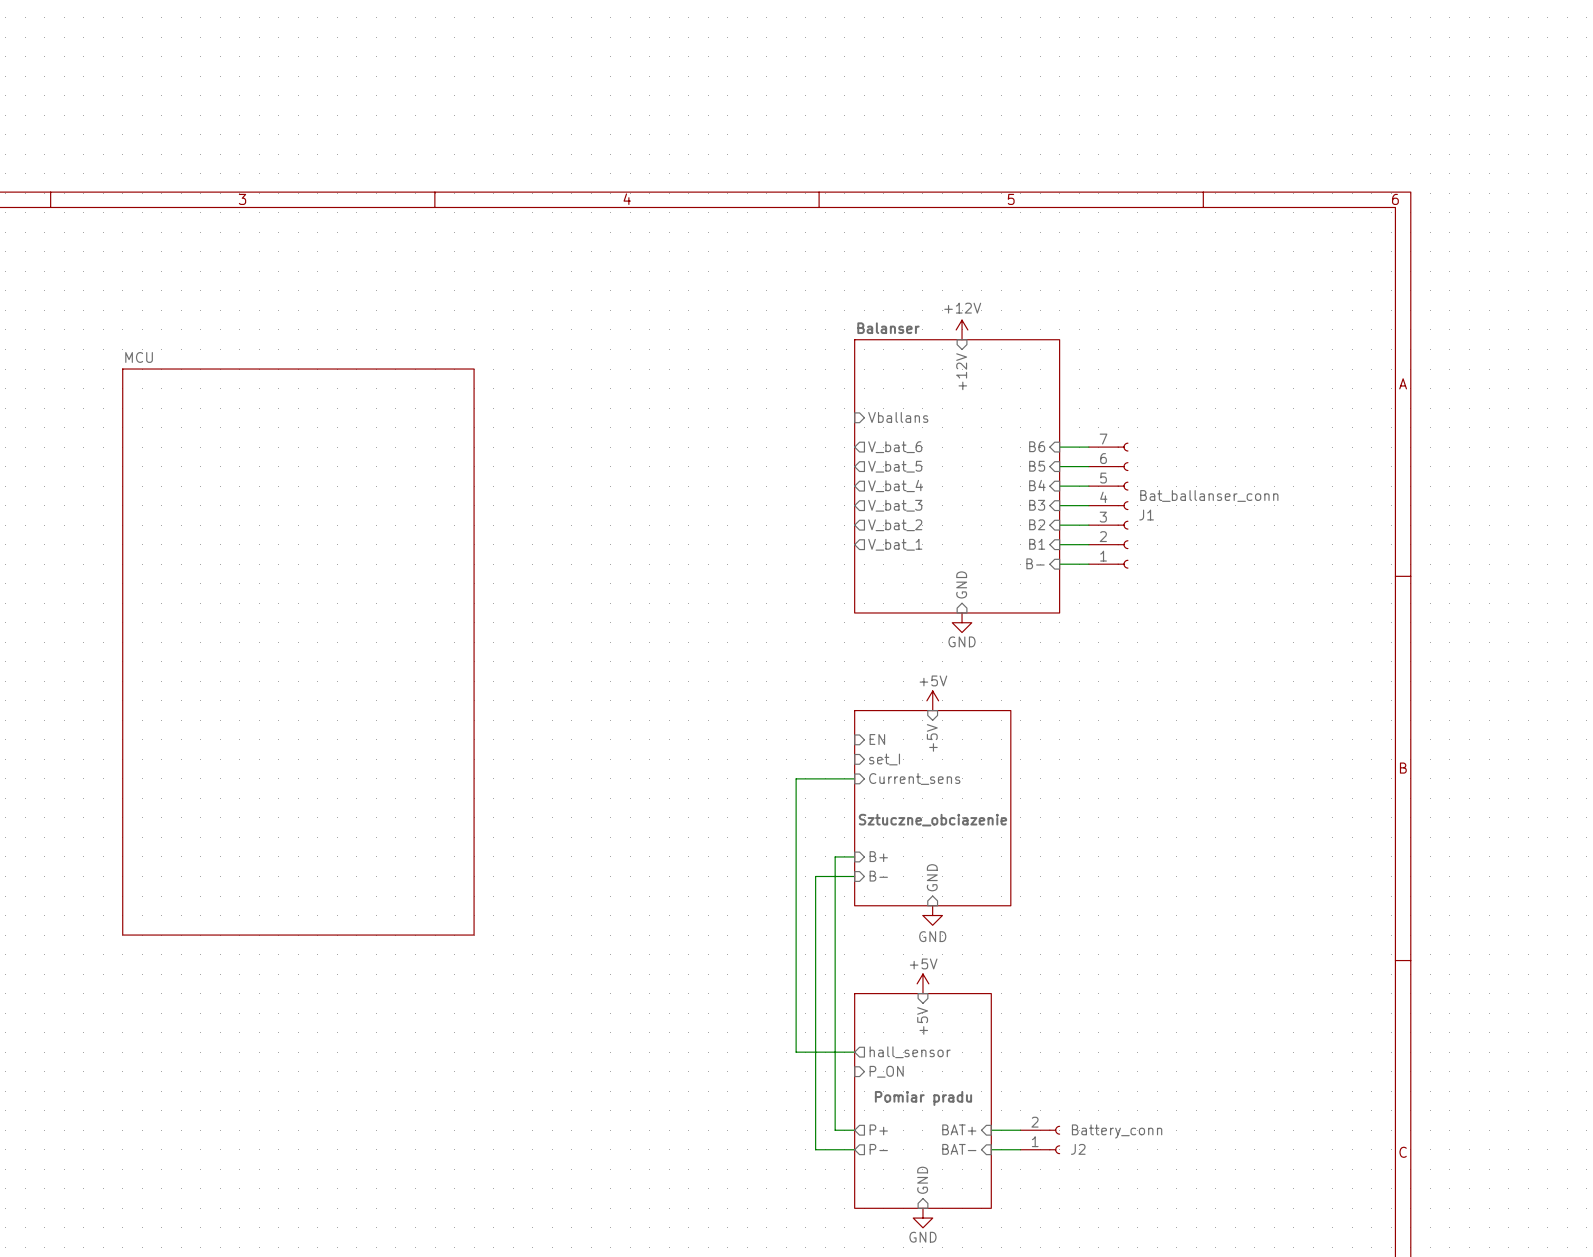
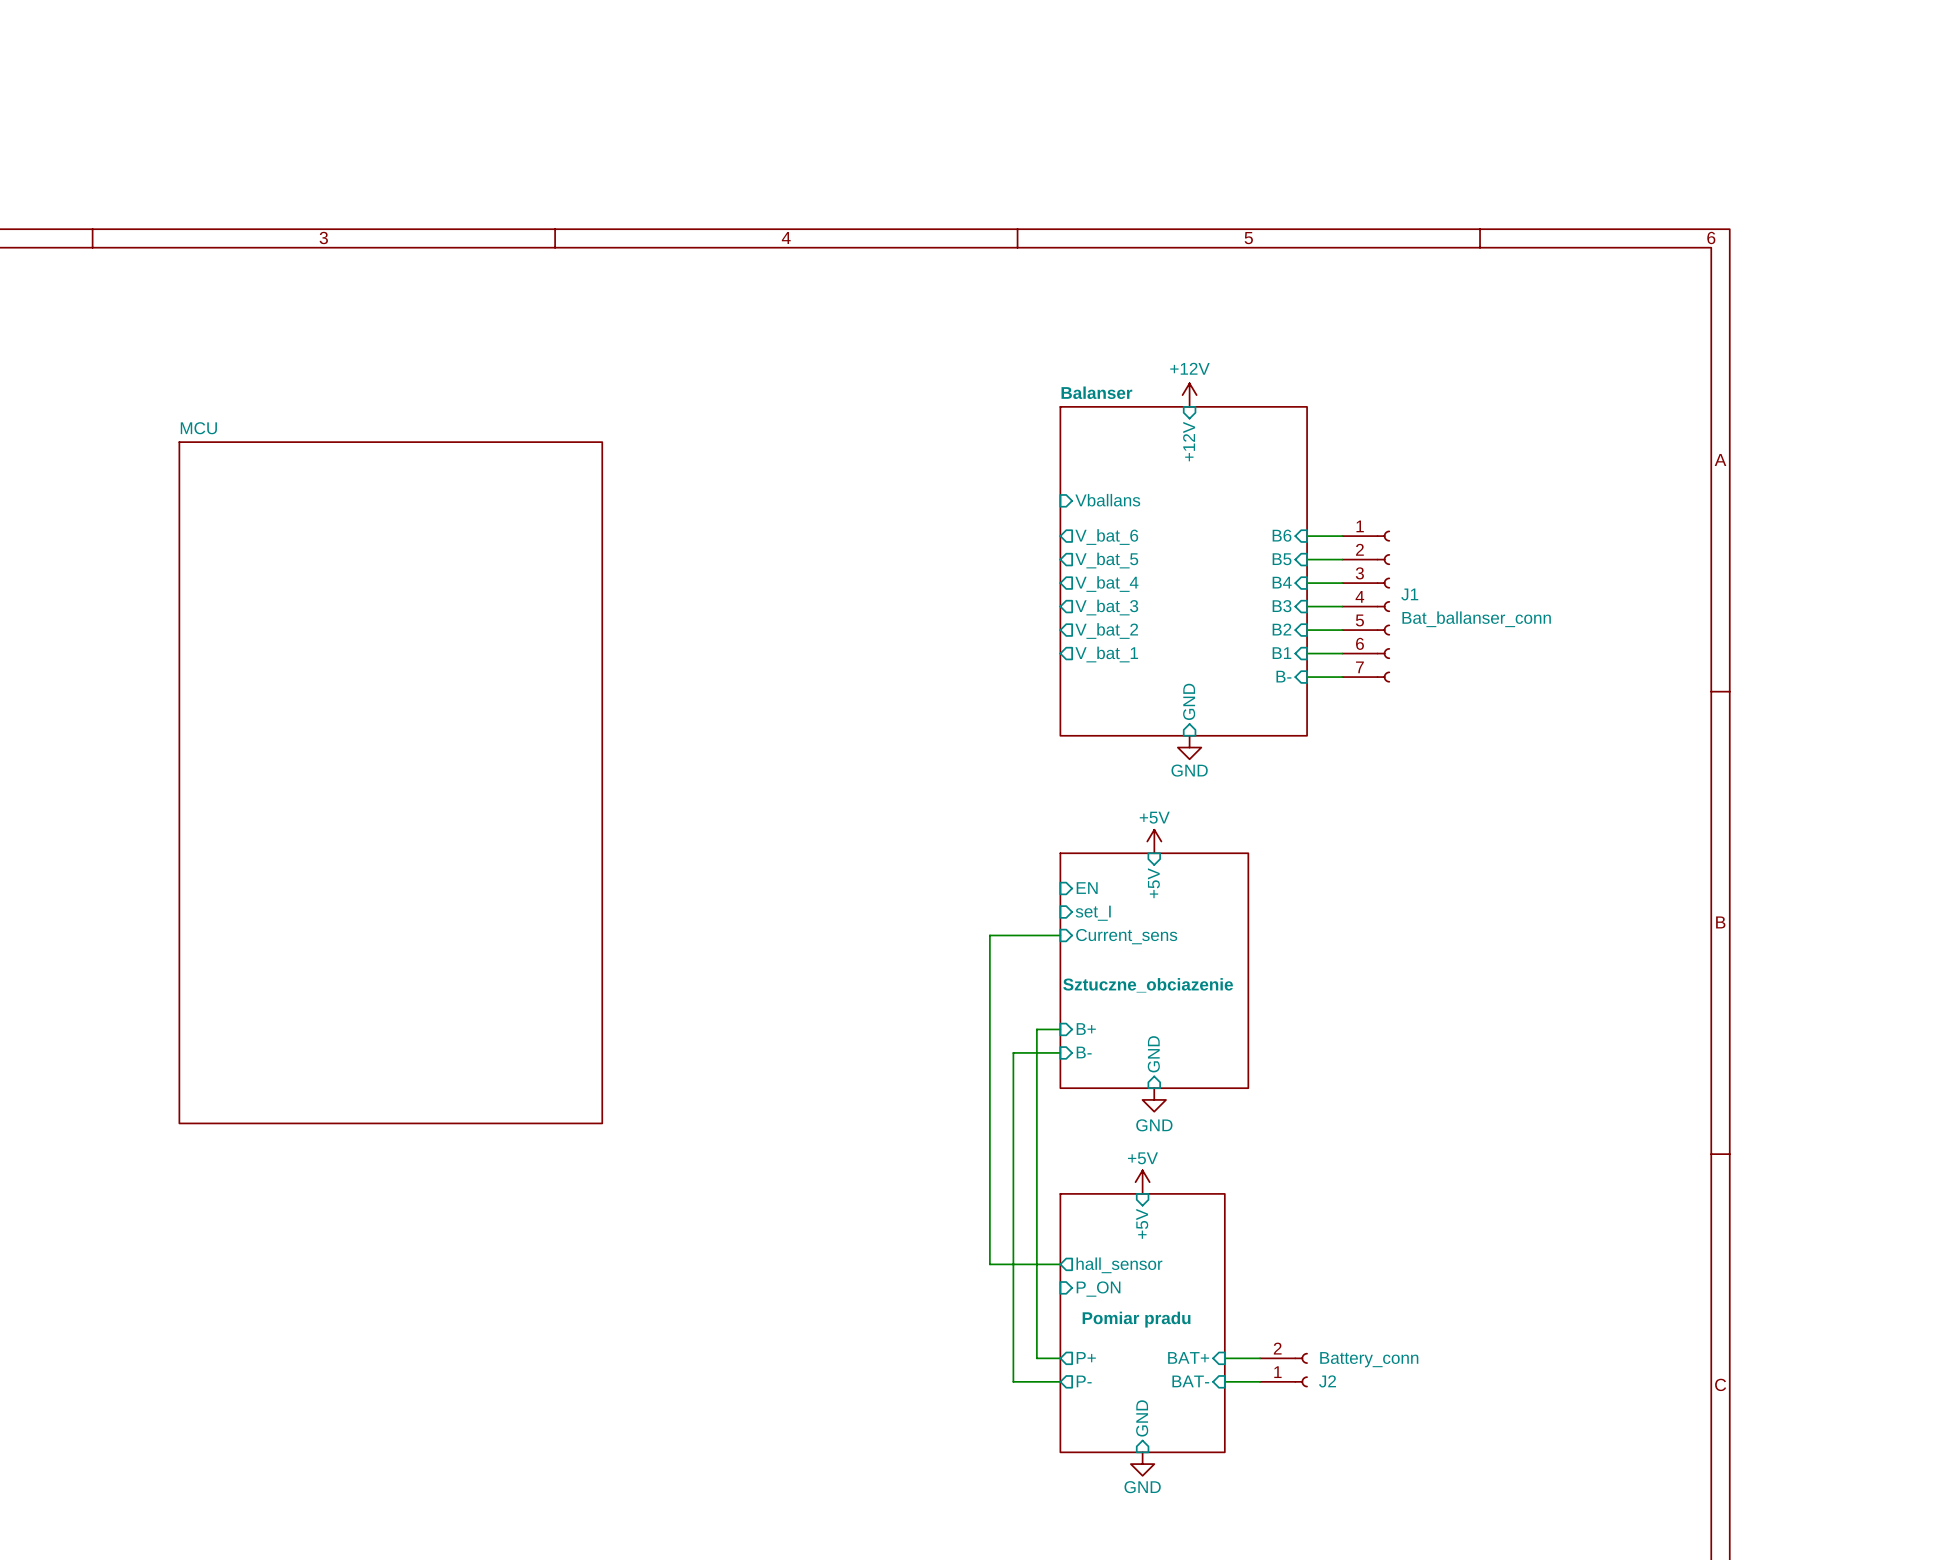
J1 flip: as is (1123, 505) -> up-down (1383, 606)

